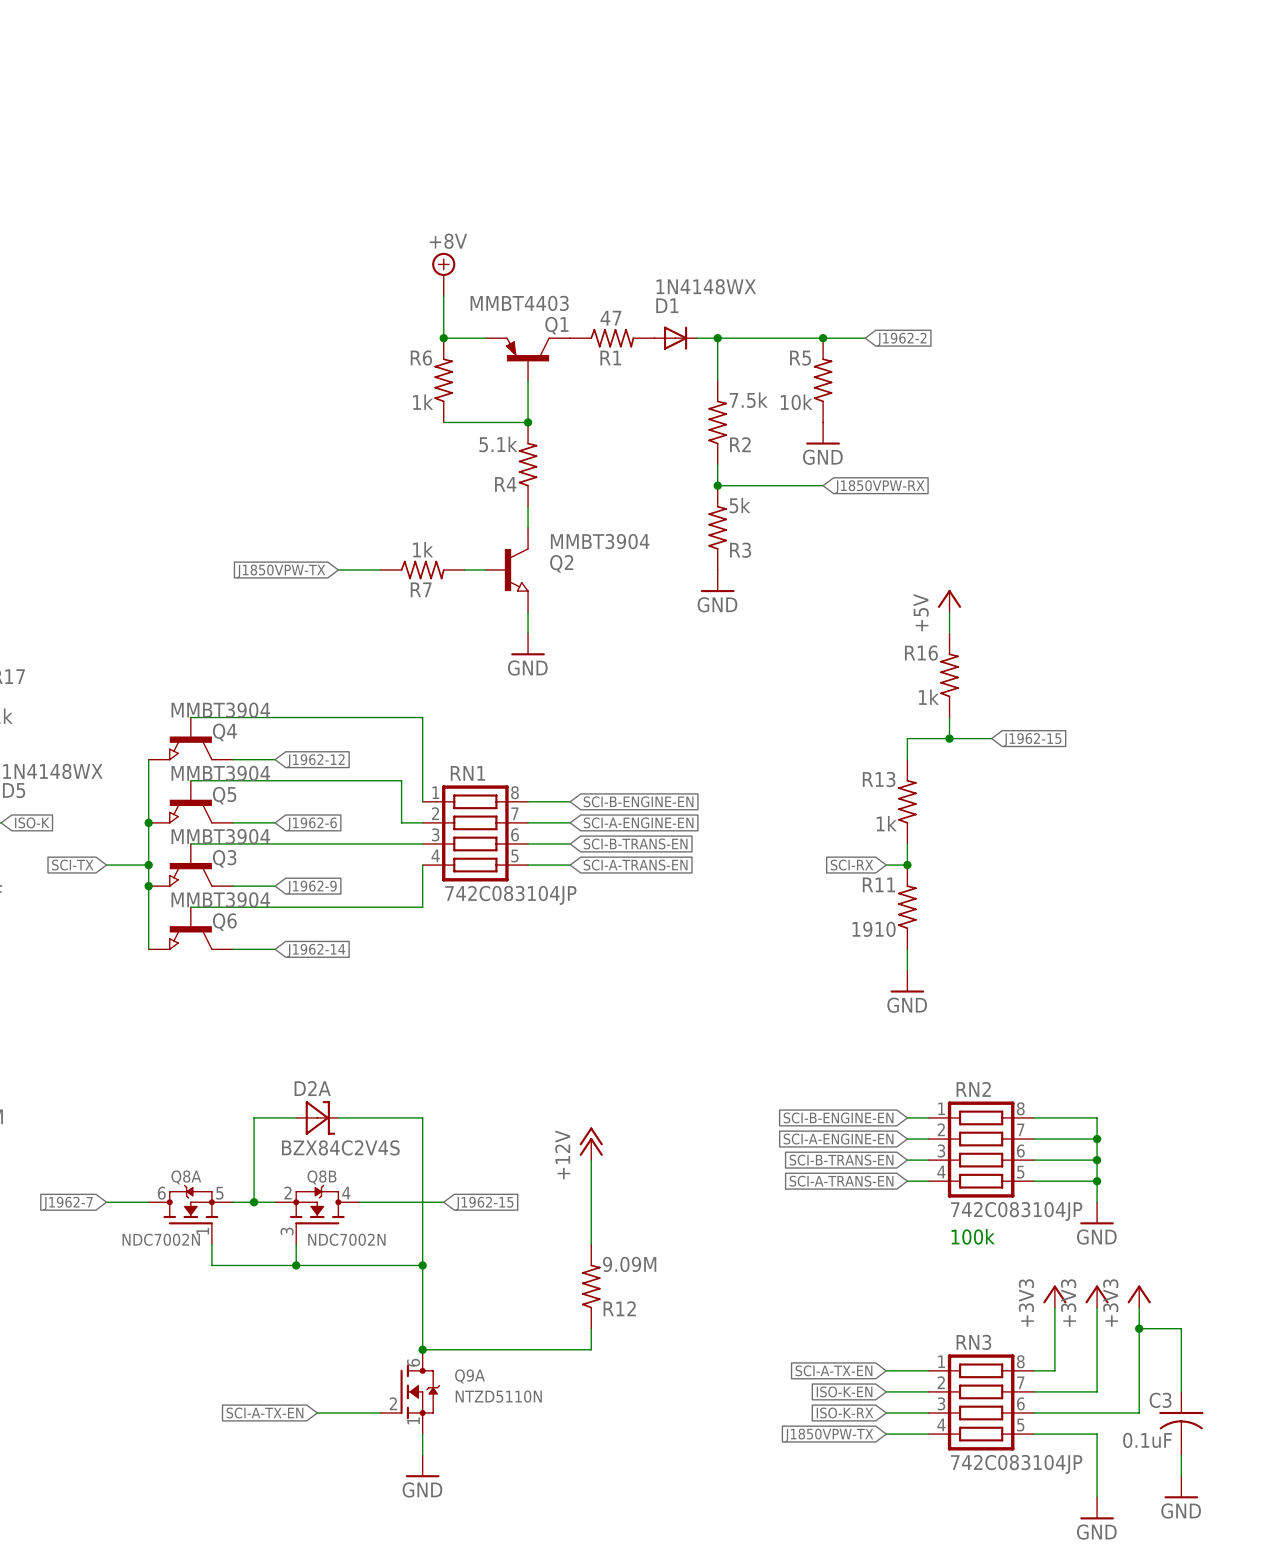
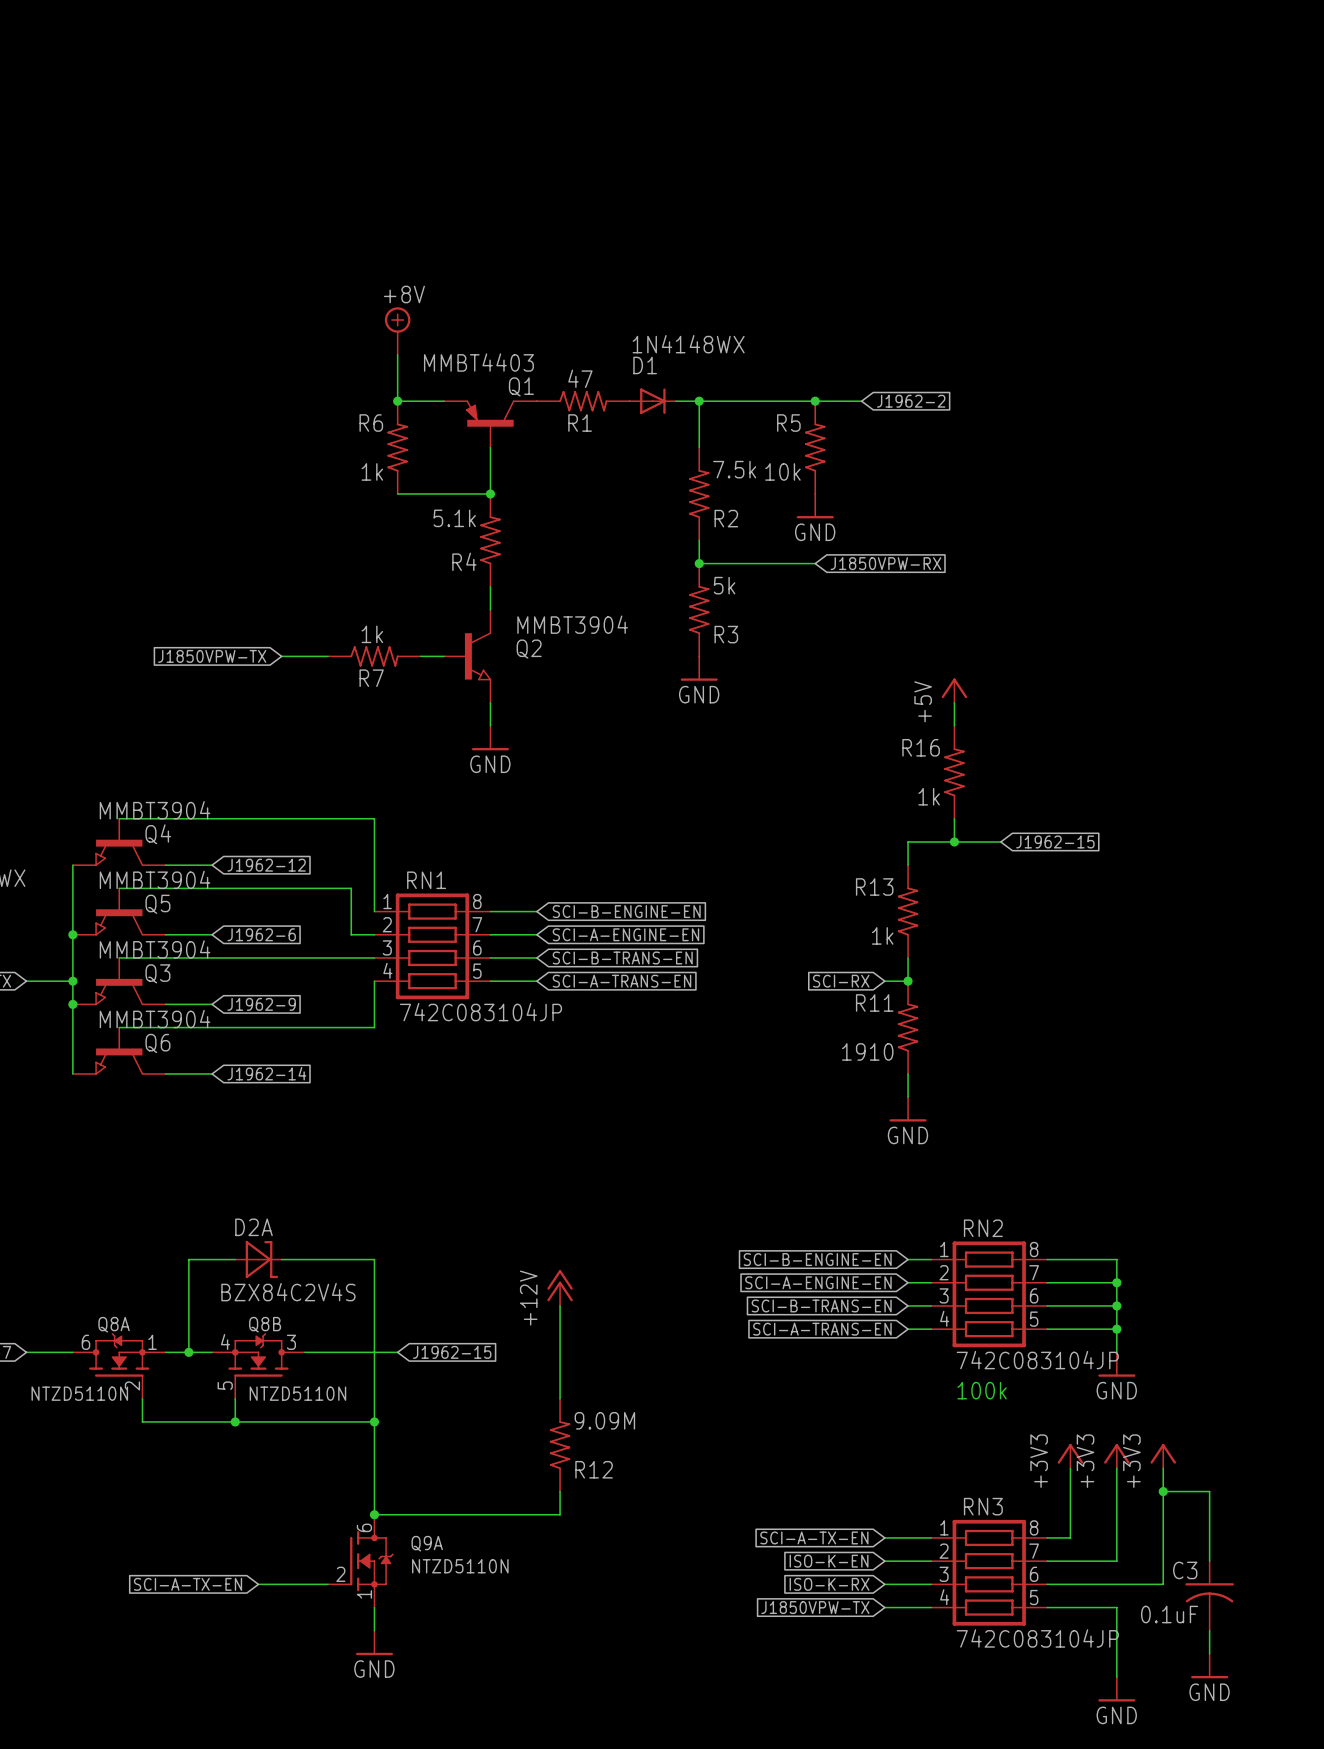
Q8A pin number: 5 (219, 1193) -> 1 (152, 1342)
Q8B pin number: 2 (287, 1193) -> 4 (225, 1341)
Q8B pin number: 4 (346, 1193) -> 3 (291, 1342)
Q8A pin number: 1 (202, 1231) -> 2 (132, 1385)
Q8B pin number: 3 (287, 1231) -> 5 (225, 1385)
Q8A value: NDC7002N (161, 1239) -> NTZD5110N (79, 1393)
Q8B value: NDC7002N (346, 1239) -> NTZD5110N (297, 1393)

